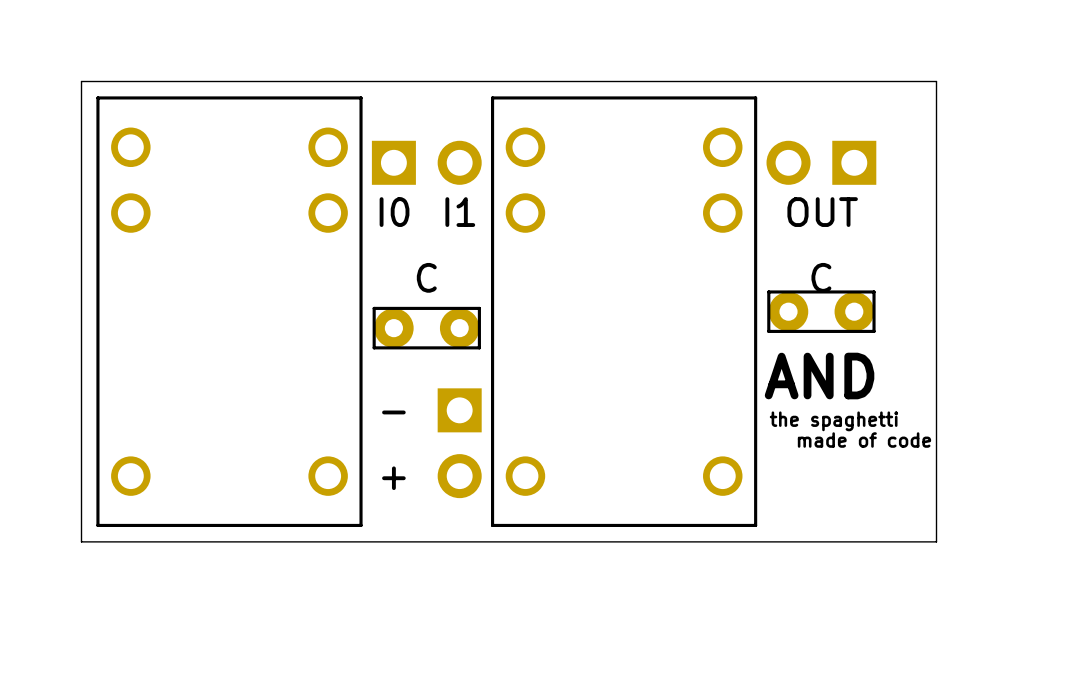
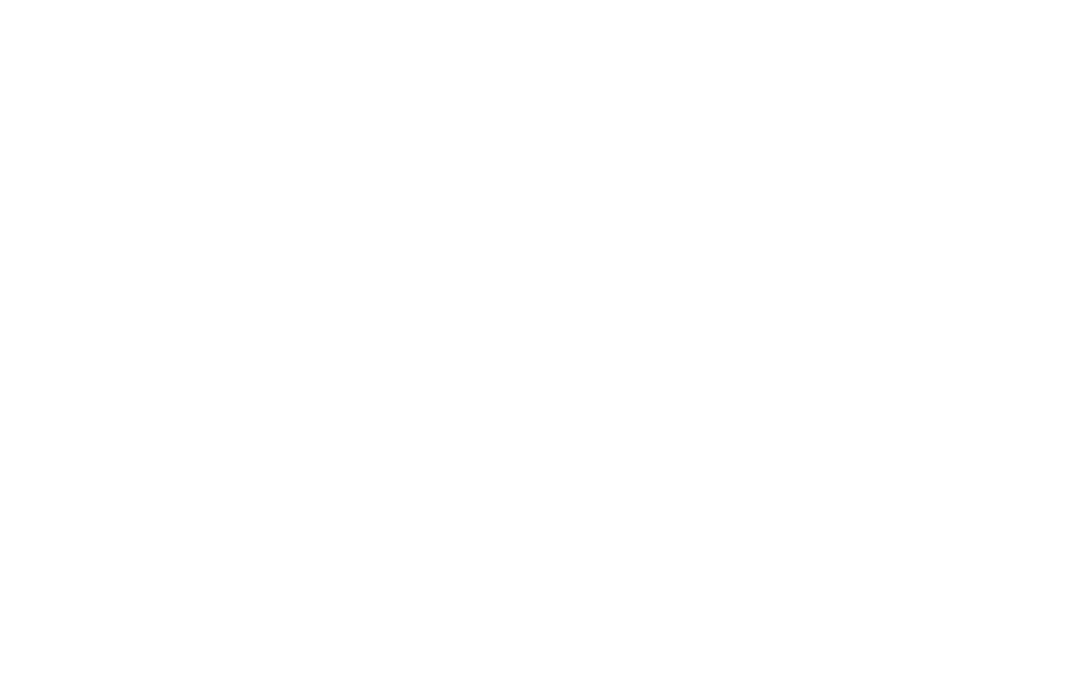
board edge: (81, 81) (81, 541) (936, 541) (936, 81) (81, 81) -> none
part: (426, 162) -> none
part: (821, 162) -> none
text: I0 (394, 212) -> none
text: I1 (460, 212) -> none
text: OUT (822, 212) -> none
text: C (426, 277) -> none
text: C (821, 277) -> none
part: (229, 311) -> none
part: (624, 311) -> none
part: (821, 311) -> none
part: (426, 328) -> none
text: AND (819, 376) -> none
text: - (393, 412) -> none
text: the spaghetti (833, 421) -> none
text: made of code (864, 440) -> none
part: (459, 443) -> none
text: + (393, 478) -> none

